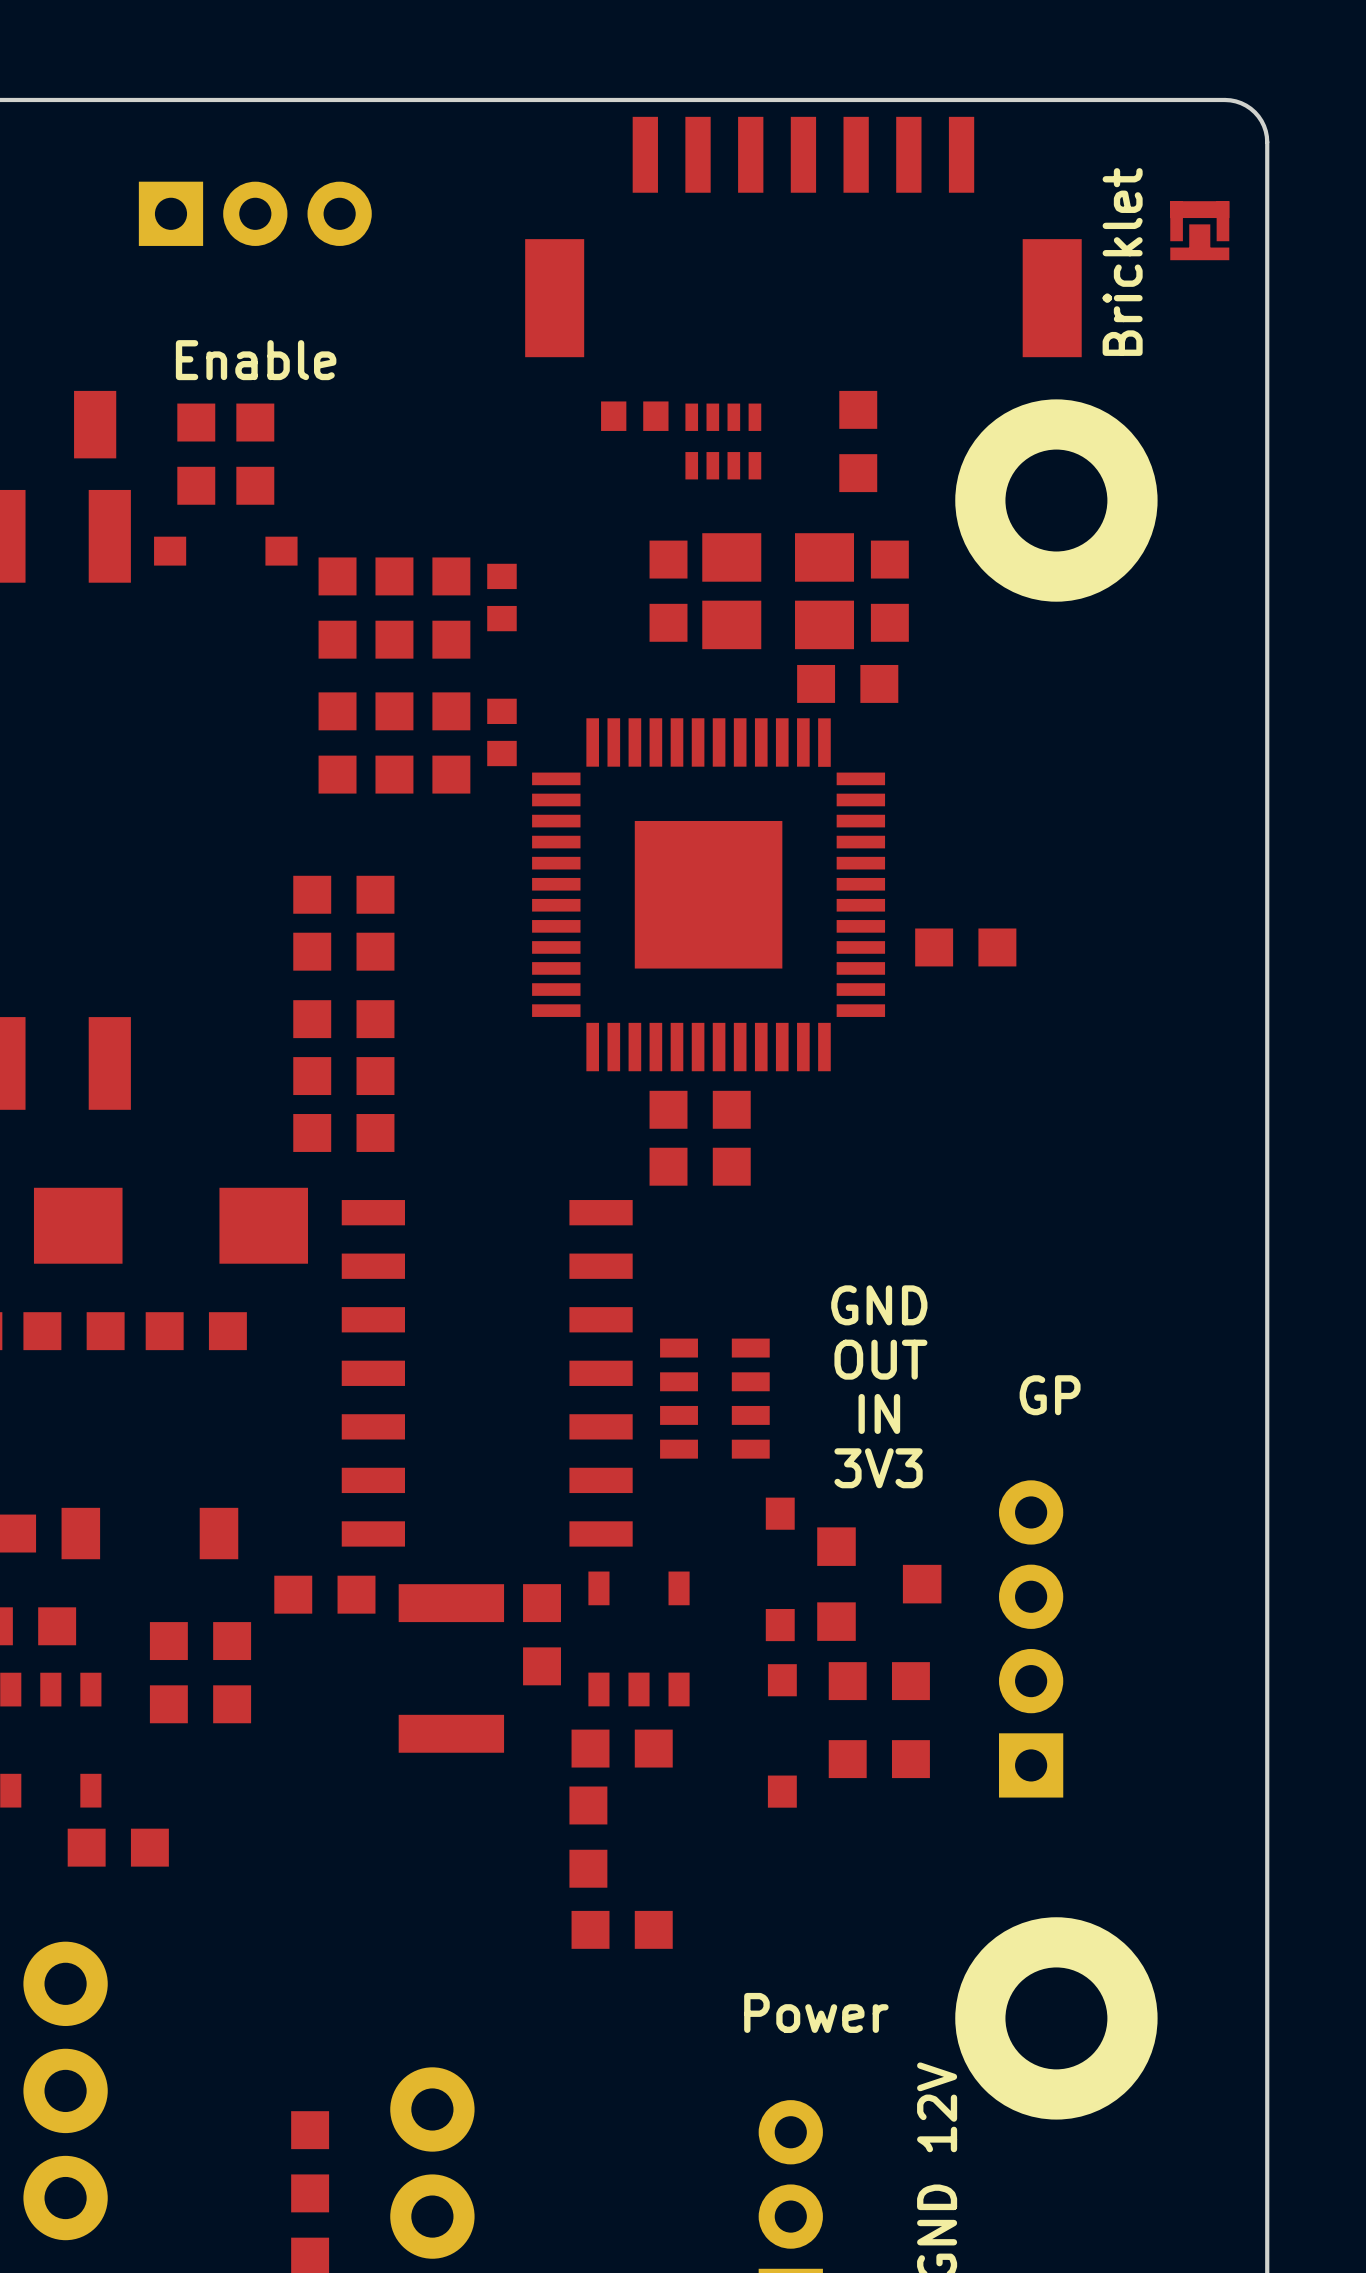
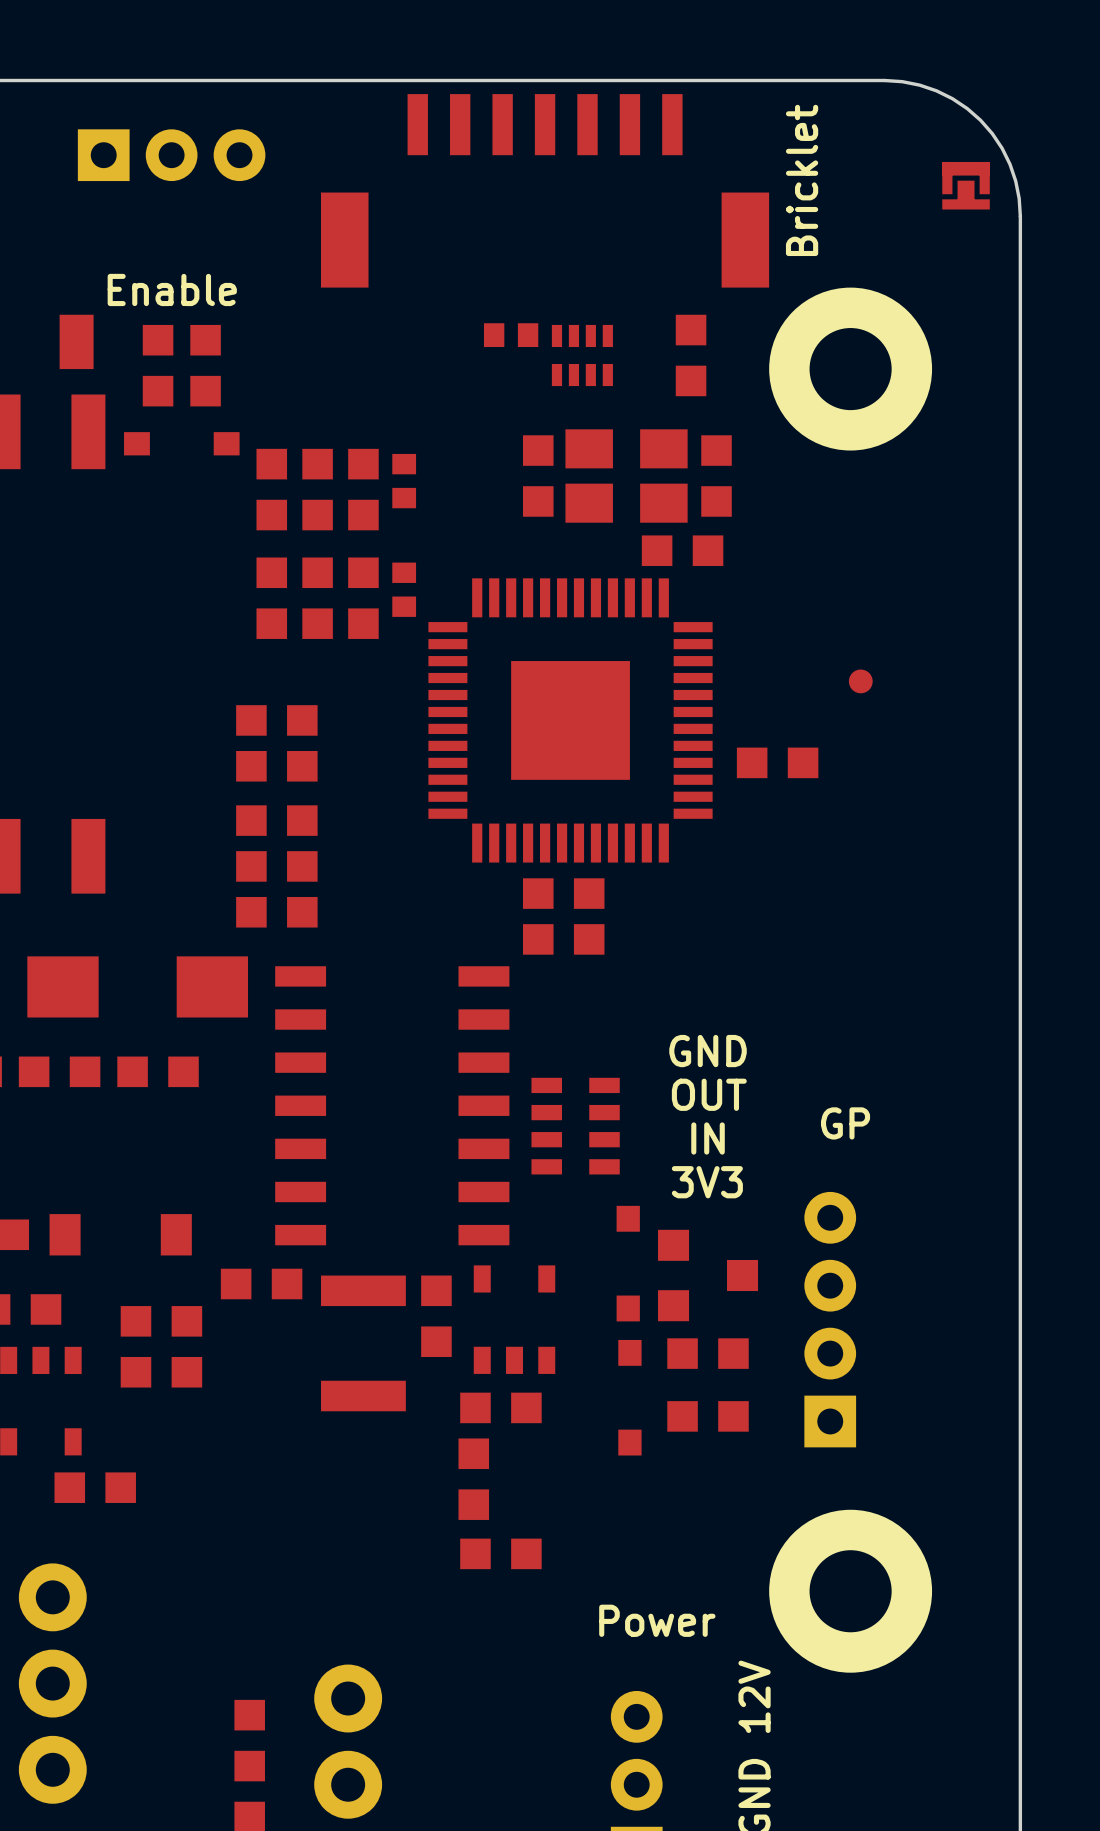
board edge: (1098, 99) (1230, 100) (1241, 103) (1254, 112) (1261, 121) (1266, 136) (1267, 268) -> (884, 80) (902, 81) (936, 90) (967, 108) (980, 120) (1002, 148) (1010, 164) (1015, 181) (1020, 216)
part position: (255, 213) -> (171, 155)
part position: (803, 237) -> (545, 190)
text position: Bricklet (1122, 262) -> Bricklet (802, 180)
text position: Enable (256, 360) -> Enable (172, 289)
part position: (1056, 500) -> (850, 369)
part: none -> (860, 681)
part position: (1056, 2018) -> (850, 1591)

